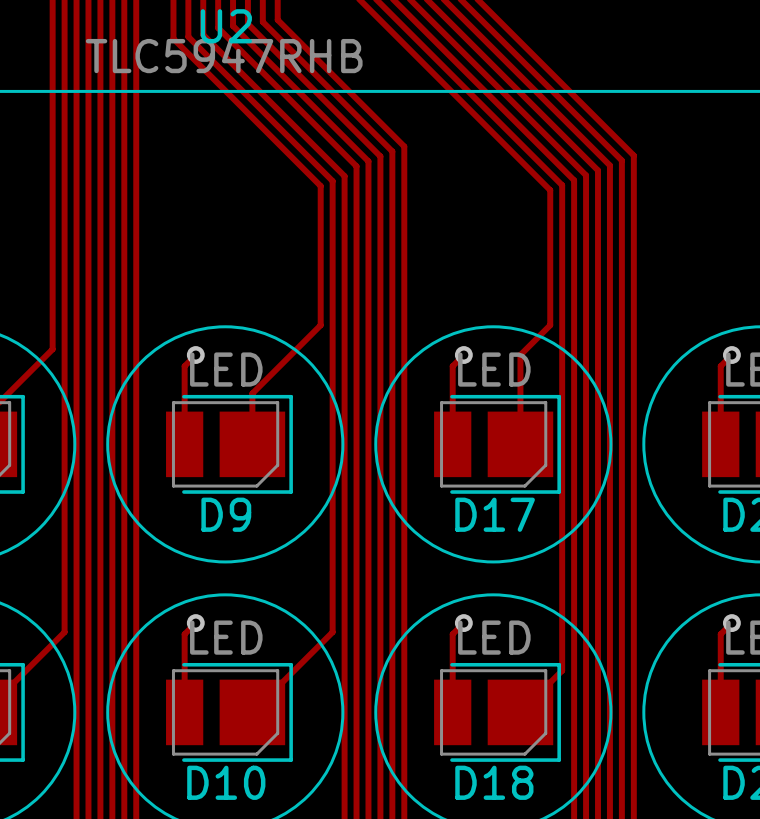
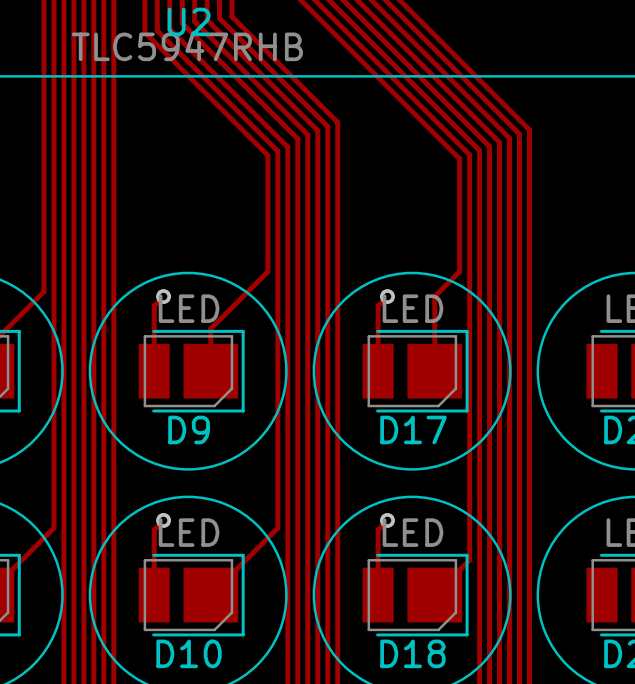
track: (731, 355) (720, 366) (720, 444) -> none
via: (731, 355) -> none
track: (731, 623) (720, 634) (720, 712) -> none
via: (731, 623) -> none

